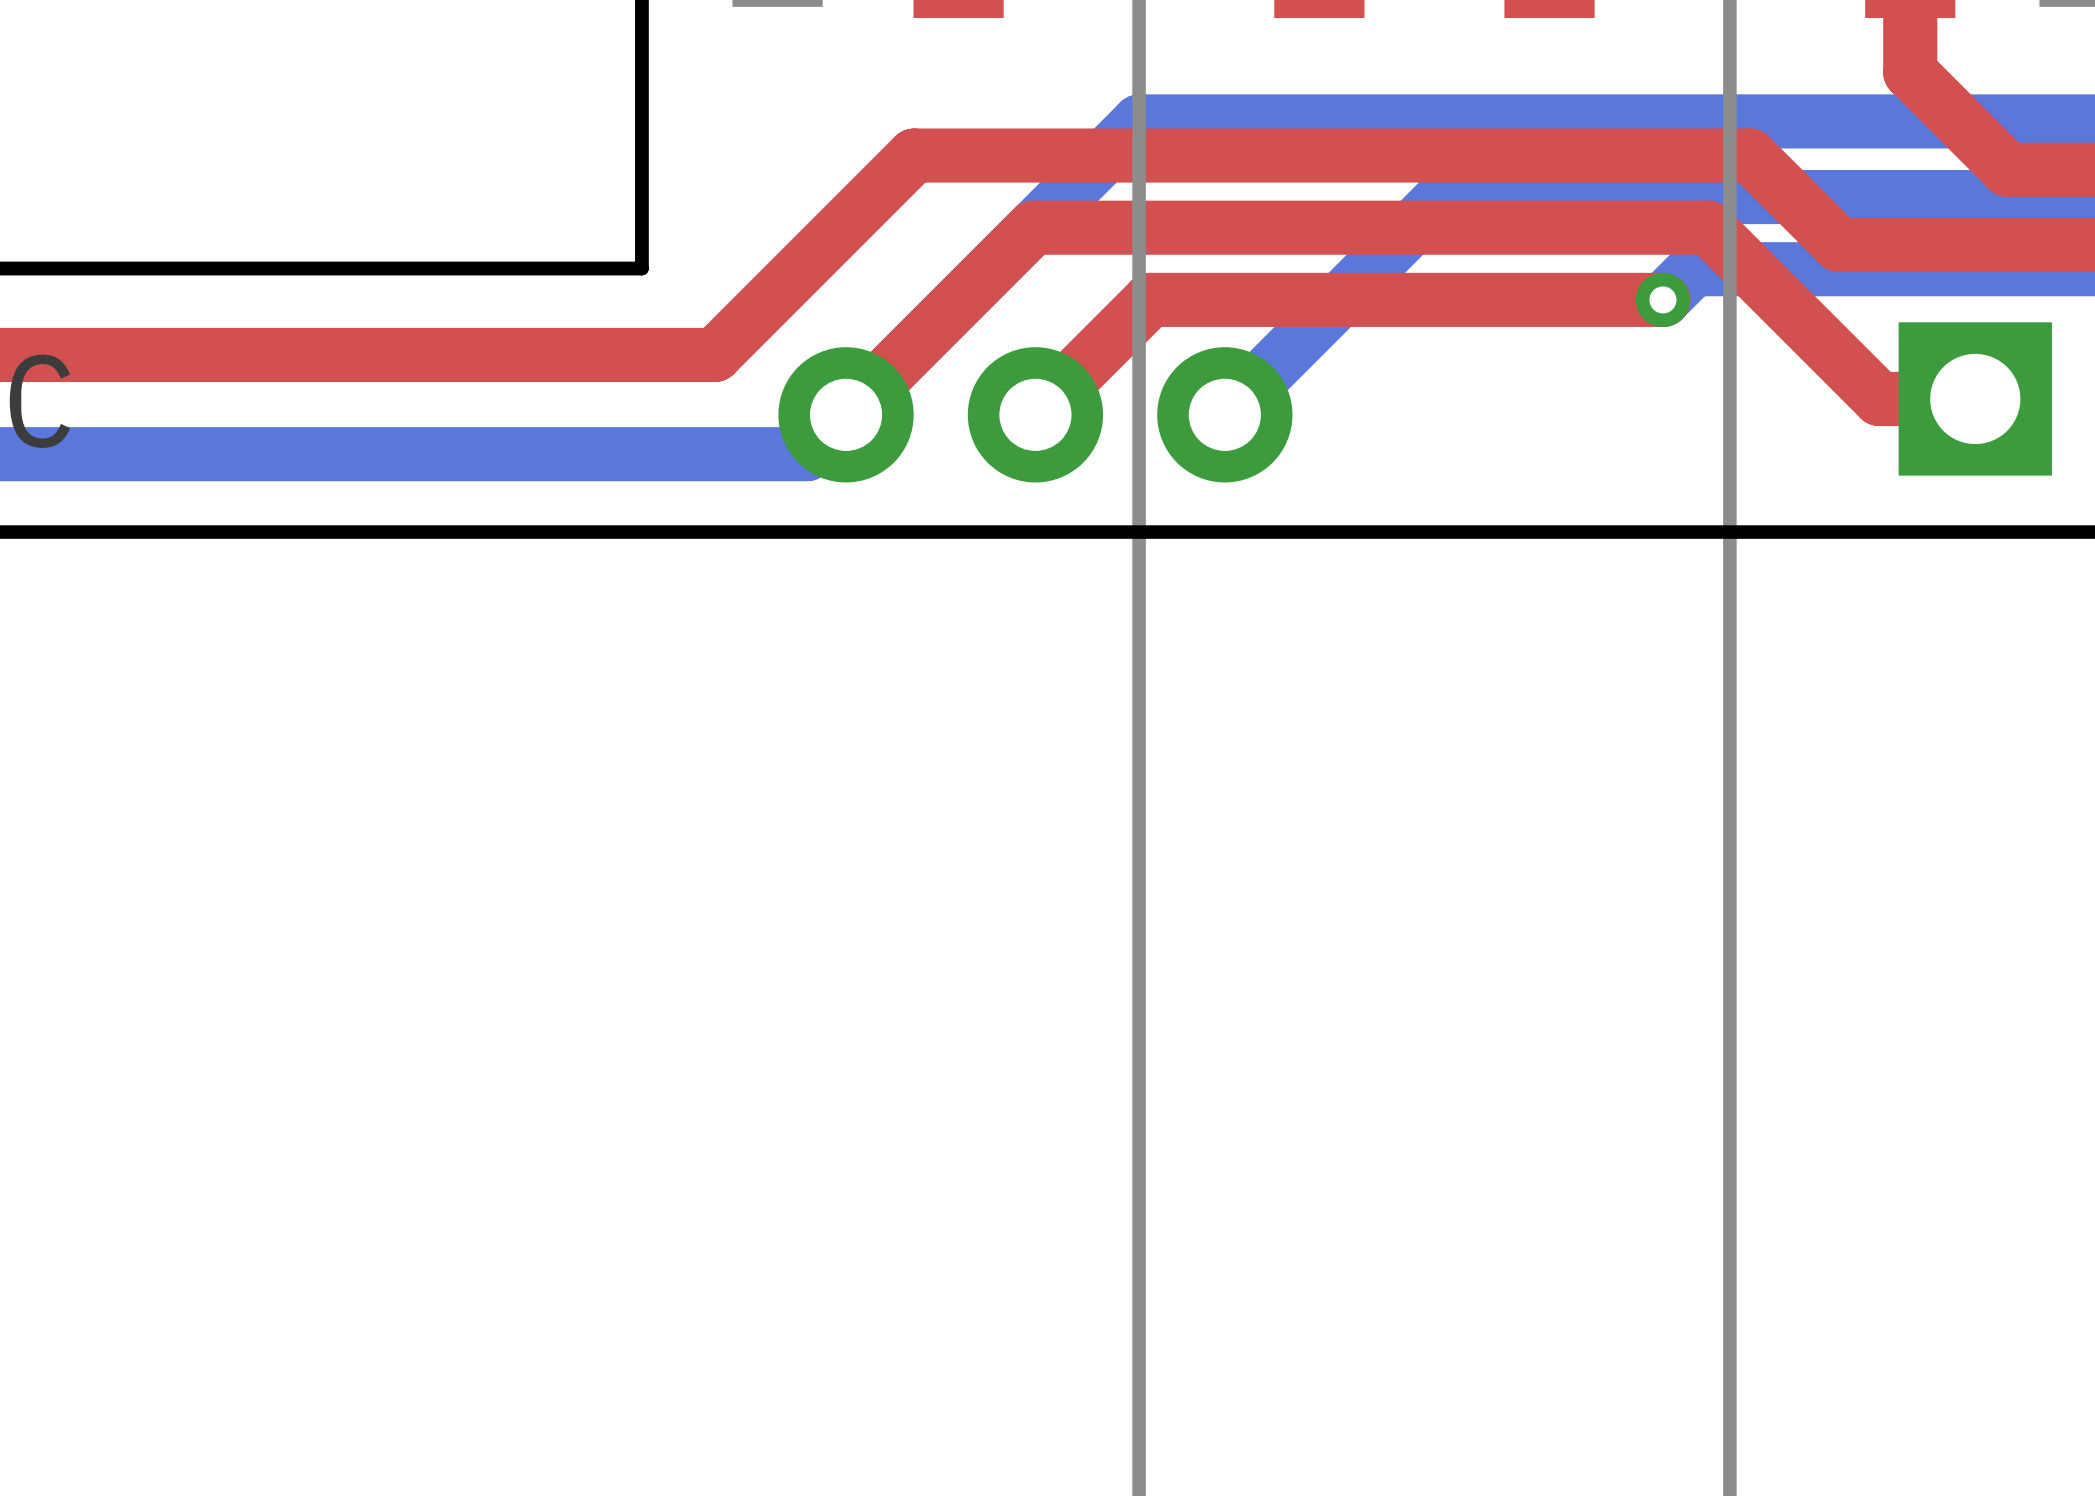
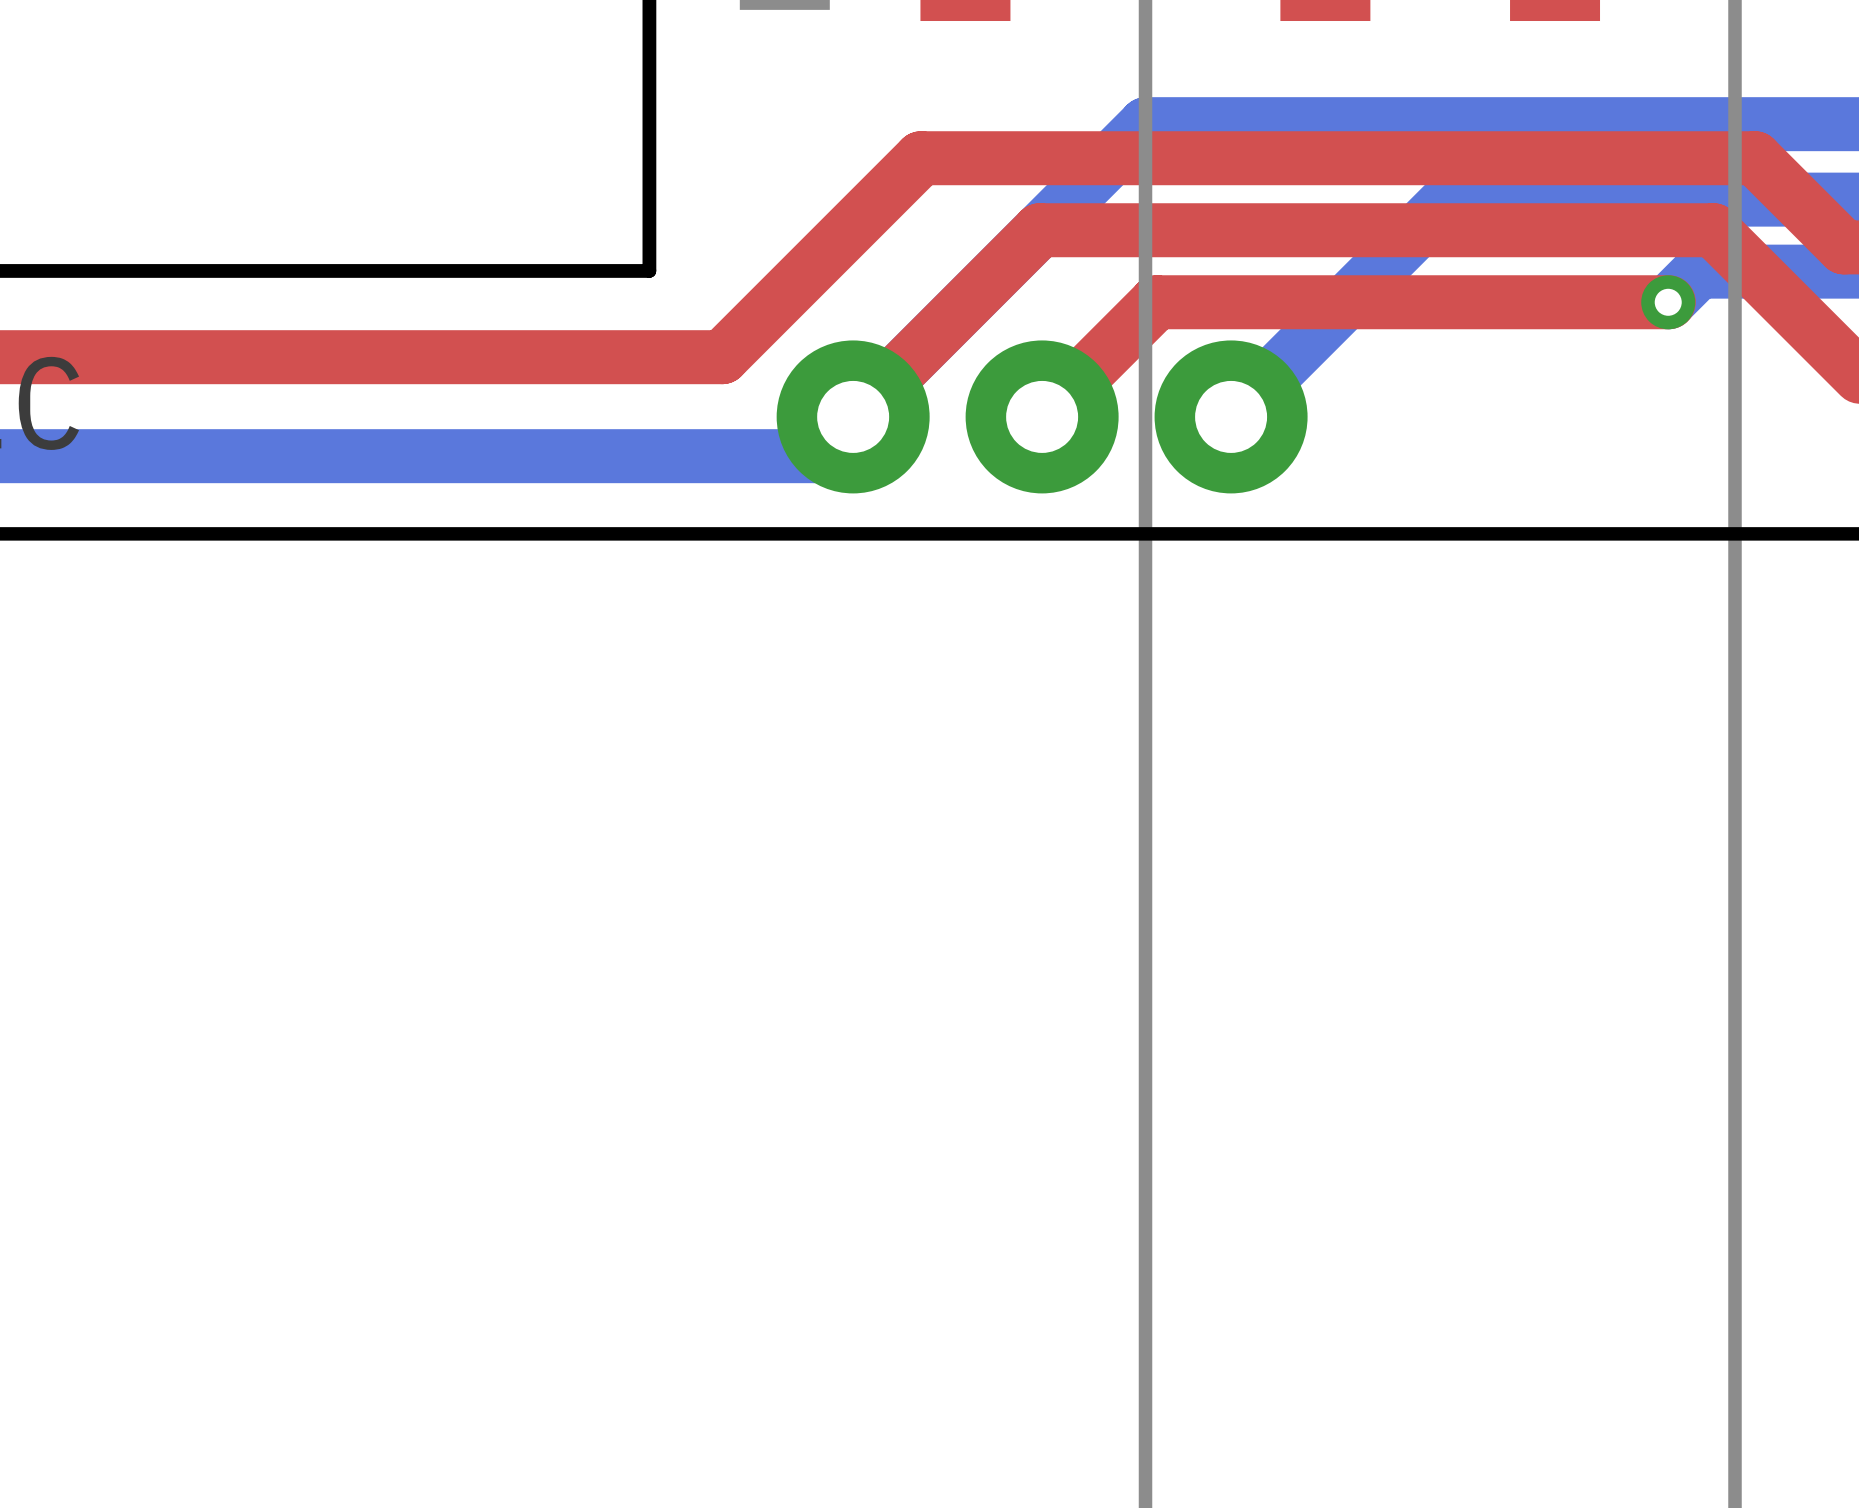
part footprint: [778, 347, 914, 483] -> [776, 340, 930, 494]
part footprint: [967, 347, 1104, 483] -> [965, 340, 1119, 494]
part footprint: [1157, 347, 1293, 483] -> [1154, 340, 1308, 494]

